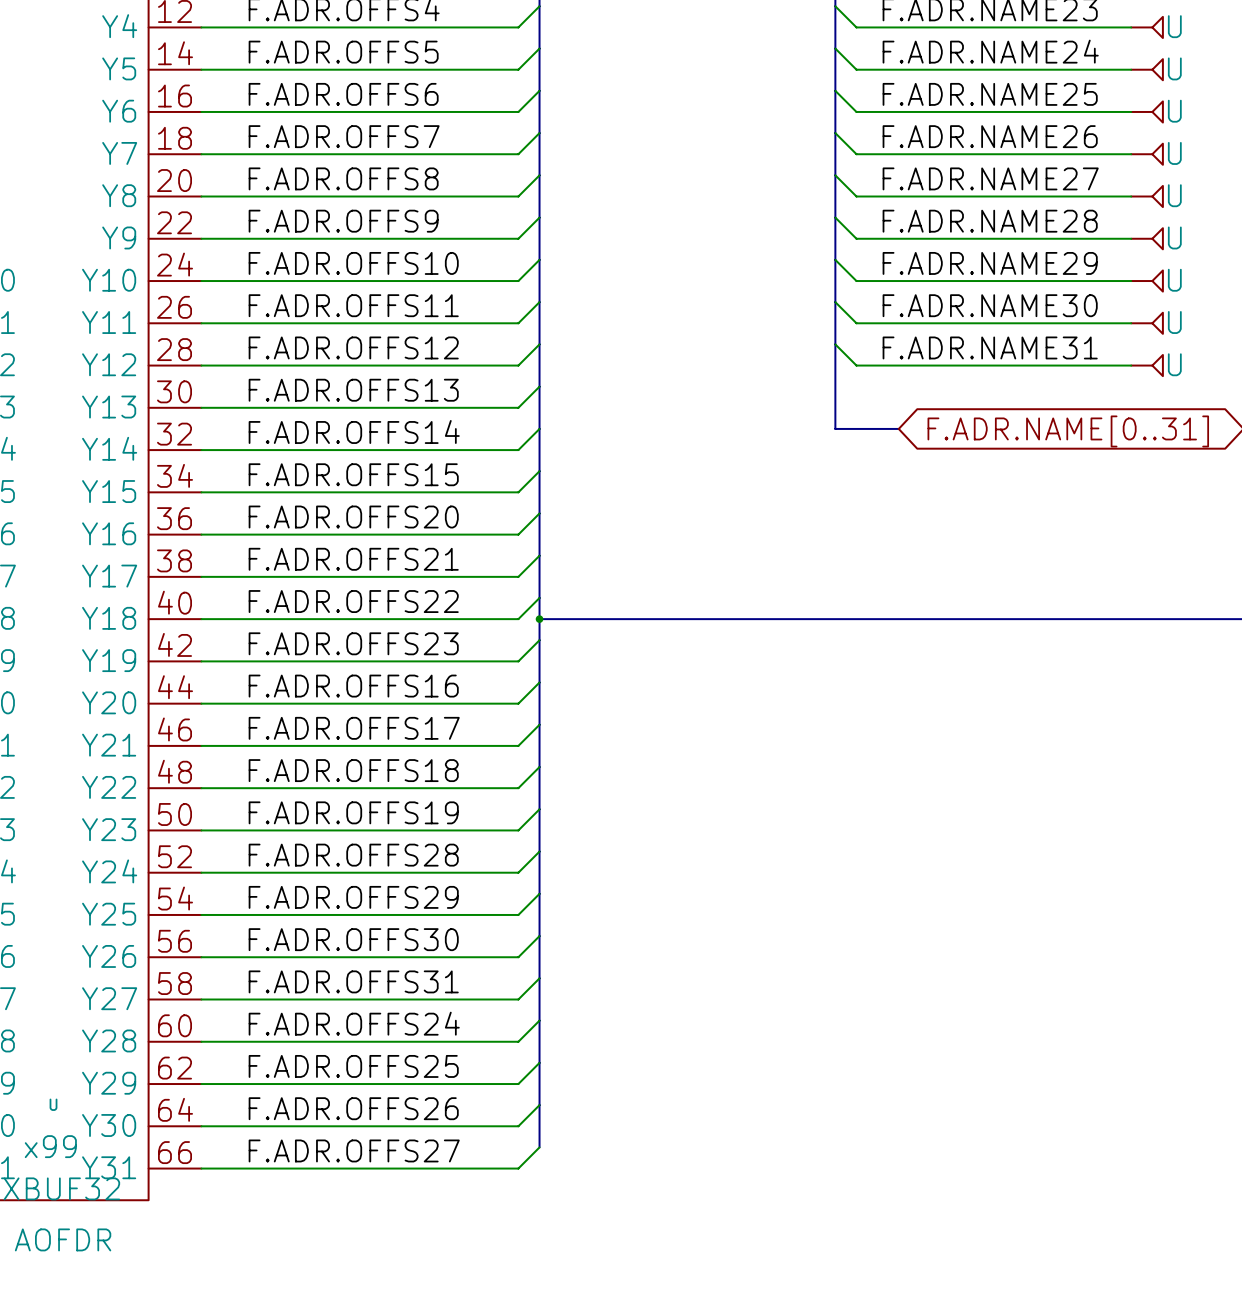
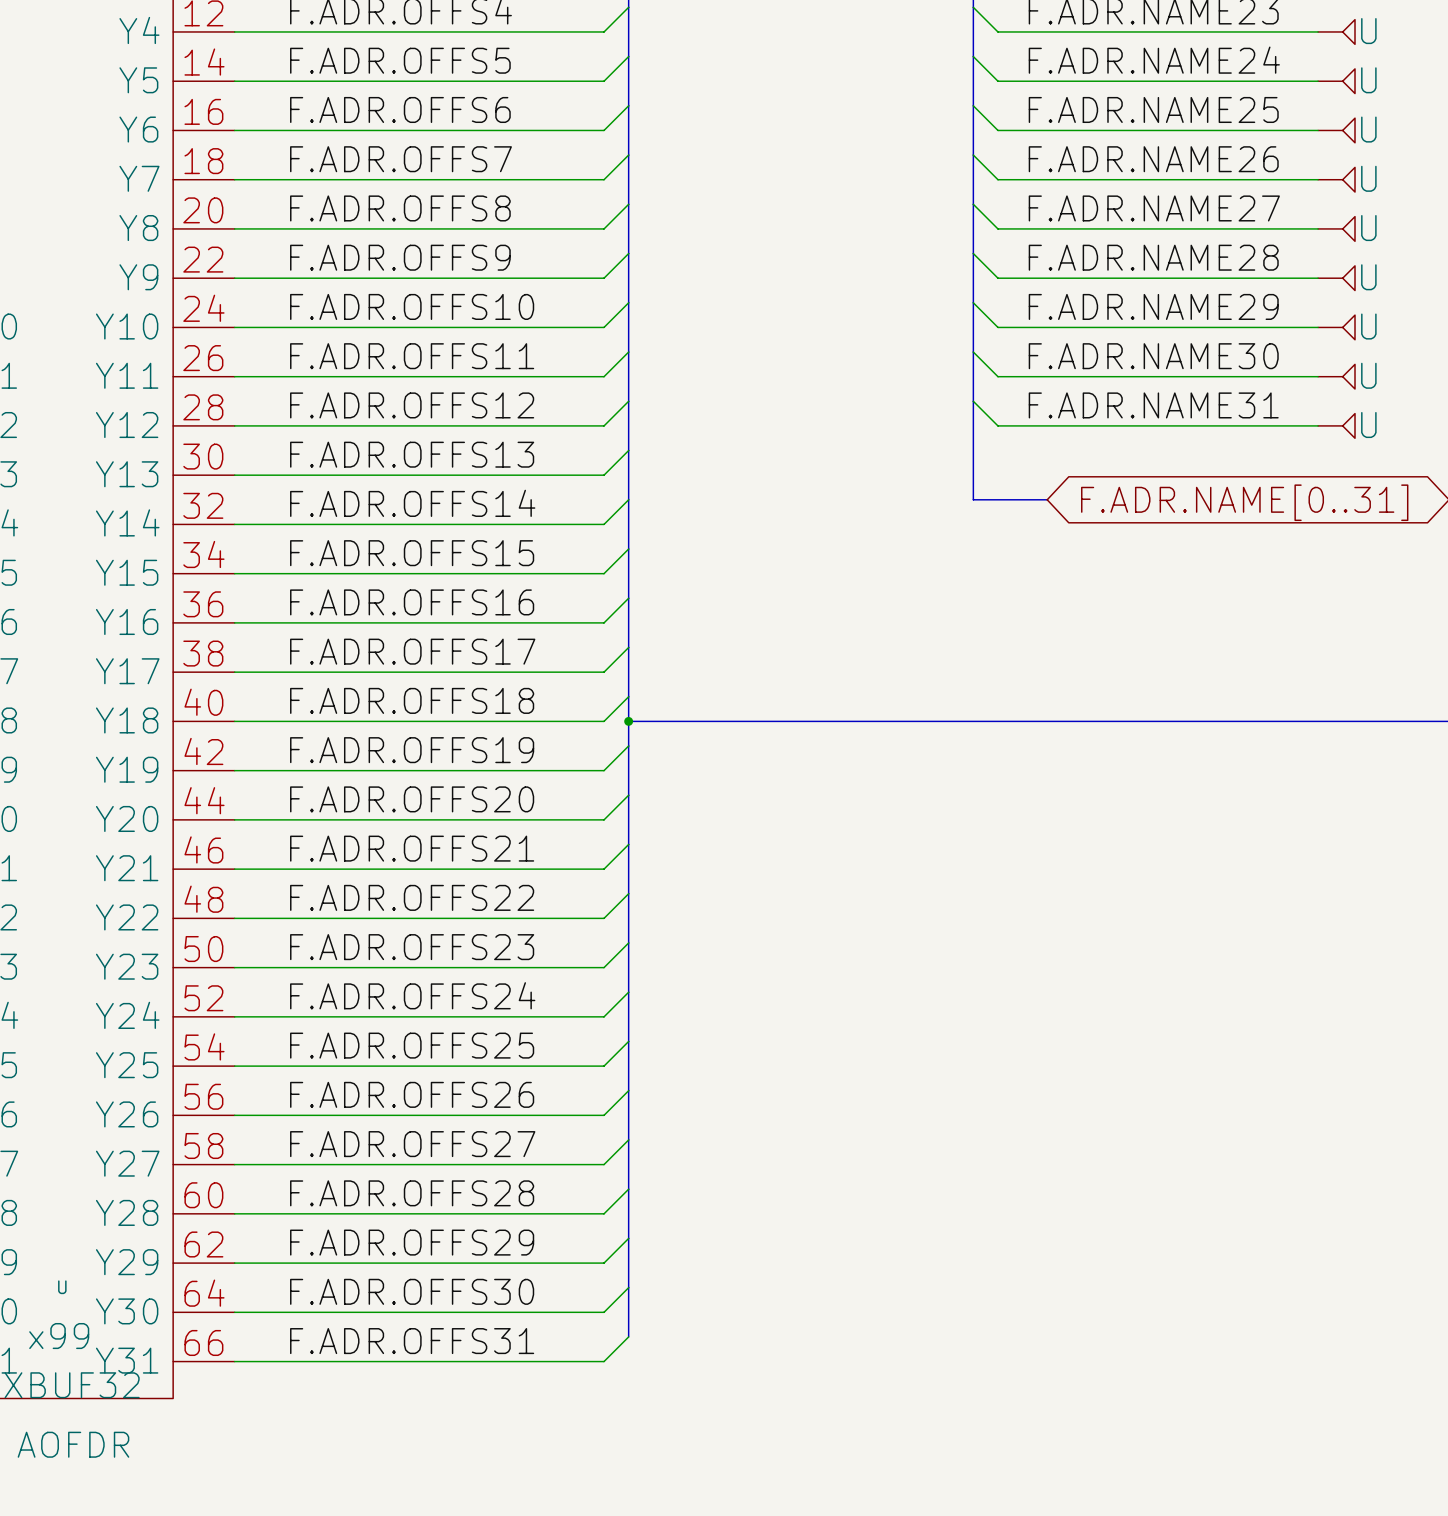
label: F.ADR.OFFS20 (353, 517) -> F.ADR.OFFS16 (412, 602)
label: F.ADR.OFFS21 (353, 559) -> F.ADR.OFFS17 (412, 651)
label: F.ADR.OFFS22 (353, 601) -> F.ADR.OFFS18 (412, 700)
label: F.ADR.OFFS23 (353, 643) -> F.ADR.OFFS19 (412, 750)
label: F.ADR.OFFS16 (353, 686) -> F.ADR.OFFS20 (412, 799)
label: F.ADR.OFFS17 (354, 728) -> F.ADR.OFFS21 (412, 848)
label: F.ADR.OFFS18 (353, 770) -> F.ADR.OFFS22 (412, 897)
label: F.ADR.OFFS19 (353, 812) -> F.ADR.OFFS23 (412, 947)
label: F.ADR.OFFS28 (353, 855) -> F.ADR.OFFS24 (412, 995)
label: F.ADR.OFFS29 (353, 897) -> F.ADR.OFFS25 (412, 1045)
label: F.ADR.OFFS30 (353, 939) -> F.ADR.OFFS26 (412, 1094)
label: F.ADR.OFFS31 (353, 981) -> F.ADR.OFFS27 (412, 1144)
label: F.ADR.OFFS24 (354, 1023) -> F.ADR.OFFS28 (412, 1193)
label: F.ADR.OFFS25 (353, 1066) -> F.ADR.OFFS29 (412, 1242)
label: F.ADR.OFFS26 (353, 1108) -> F.ADR.OFFS30 (412, 1291)
label: F.ADR.OFFS27 (354, 1150) -> F.ADR.OFFS31 (412, 1341)

